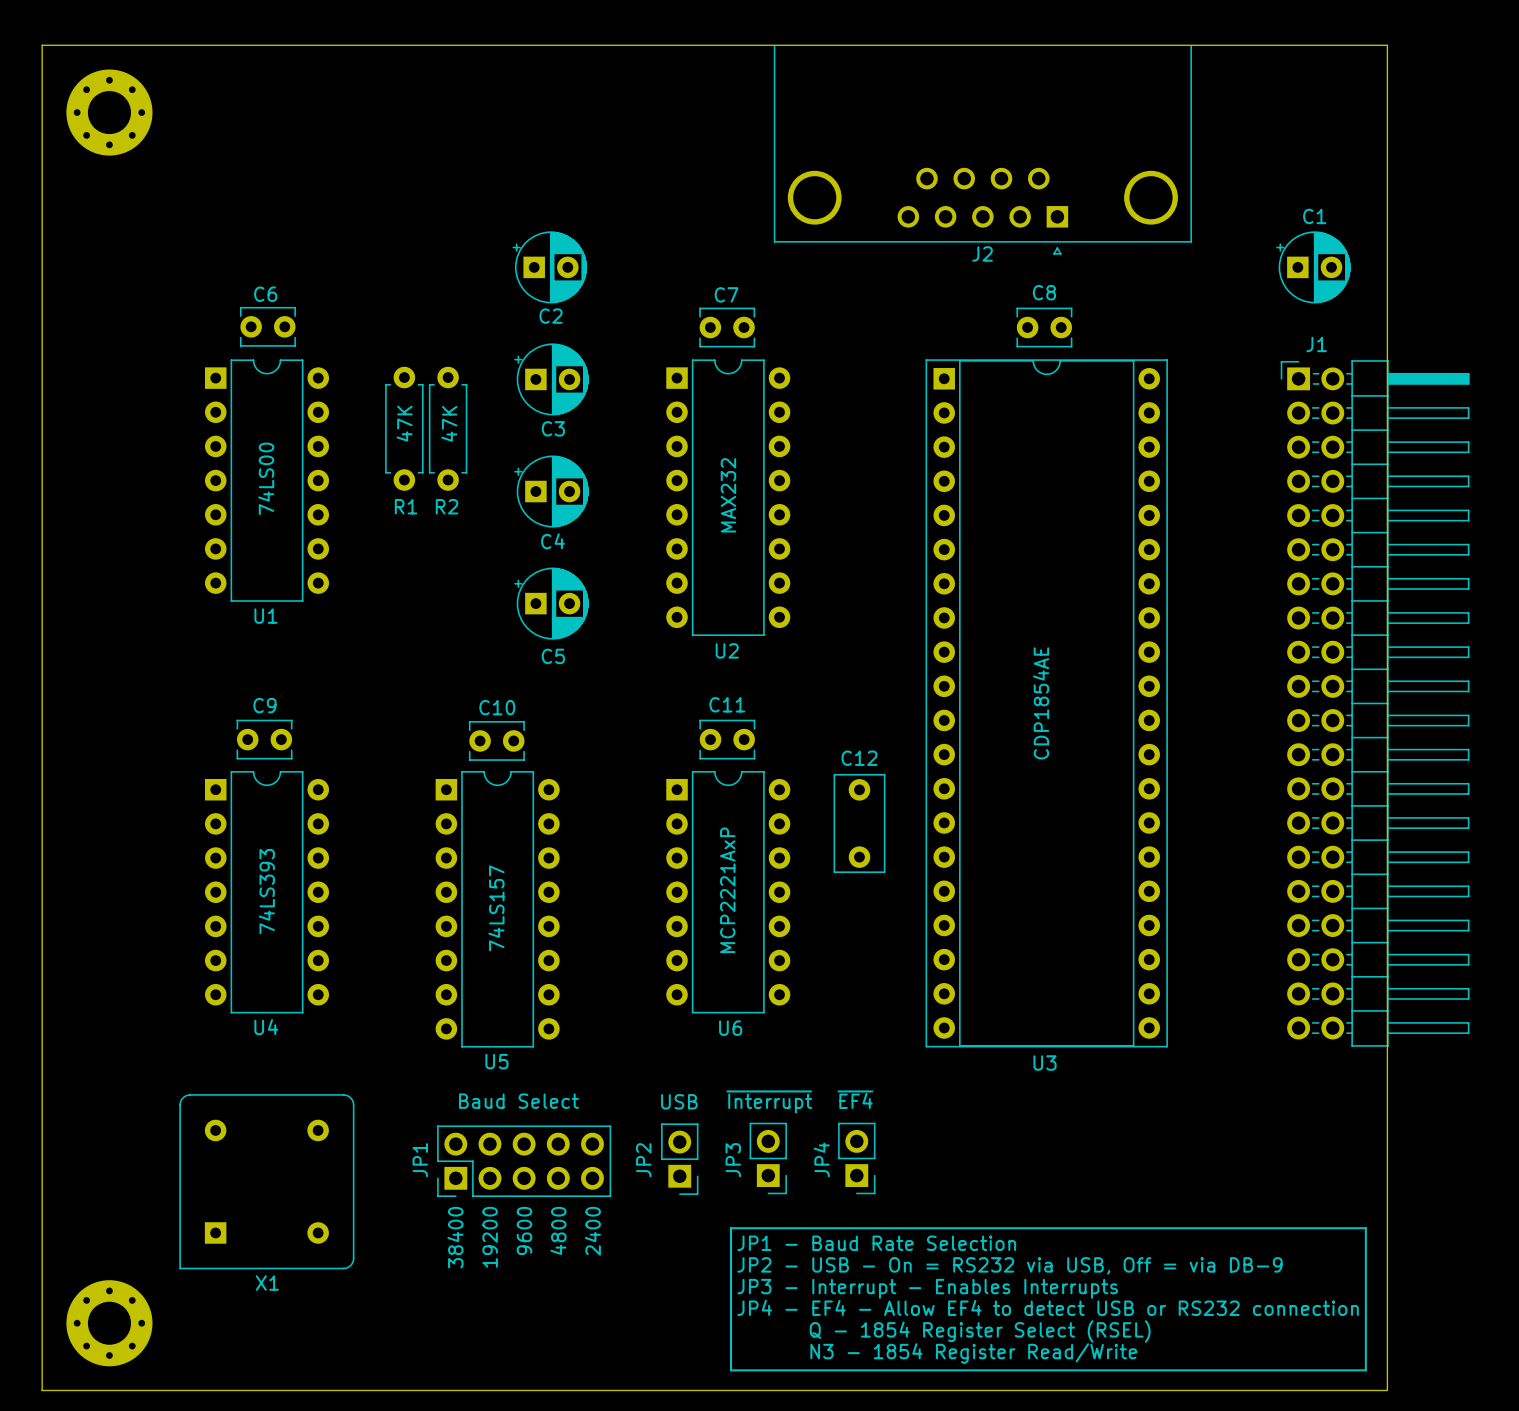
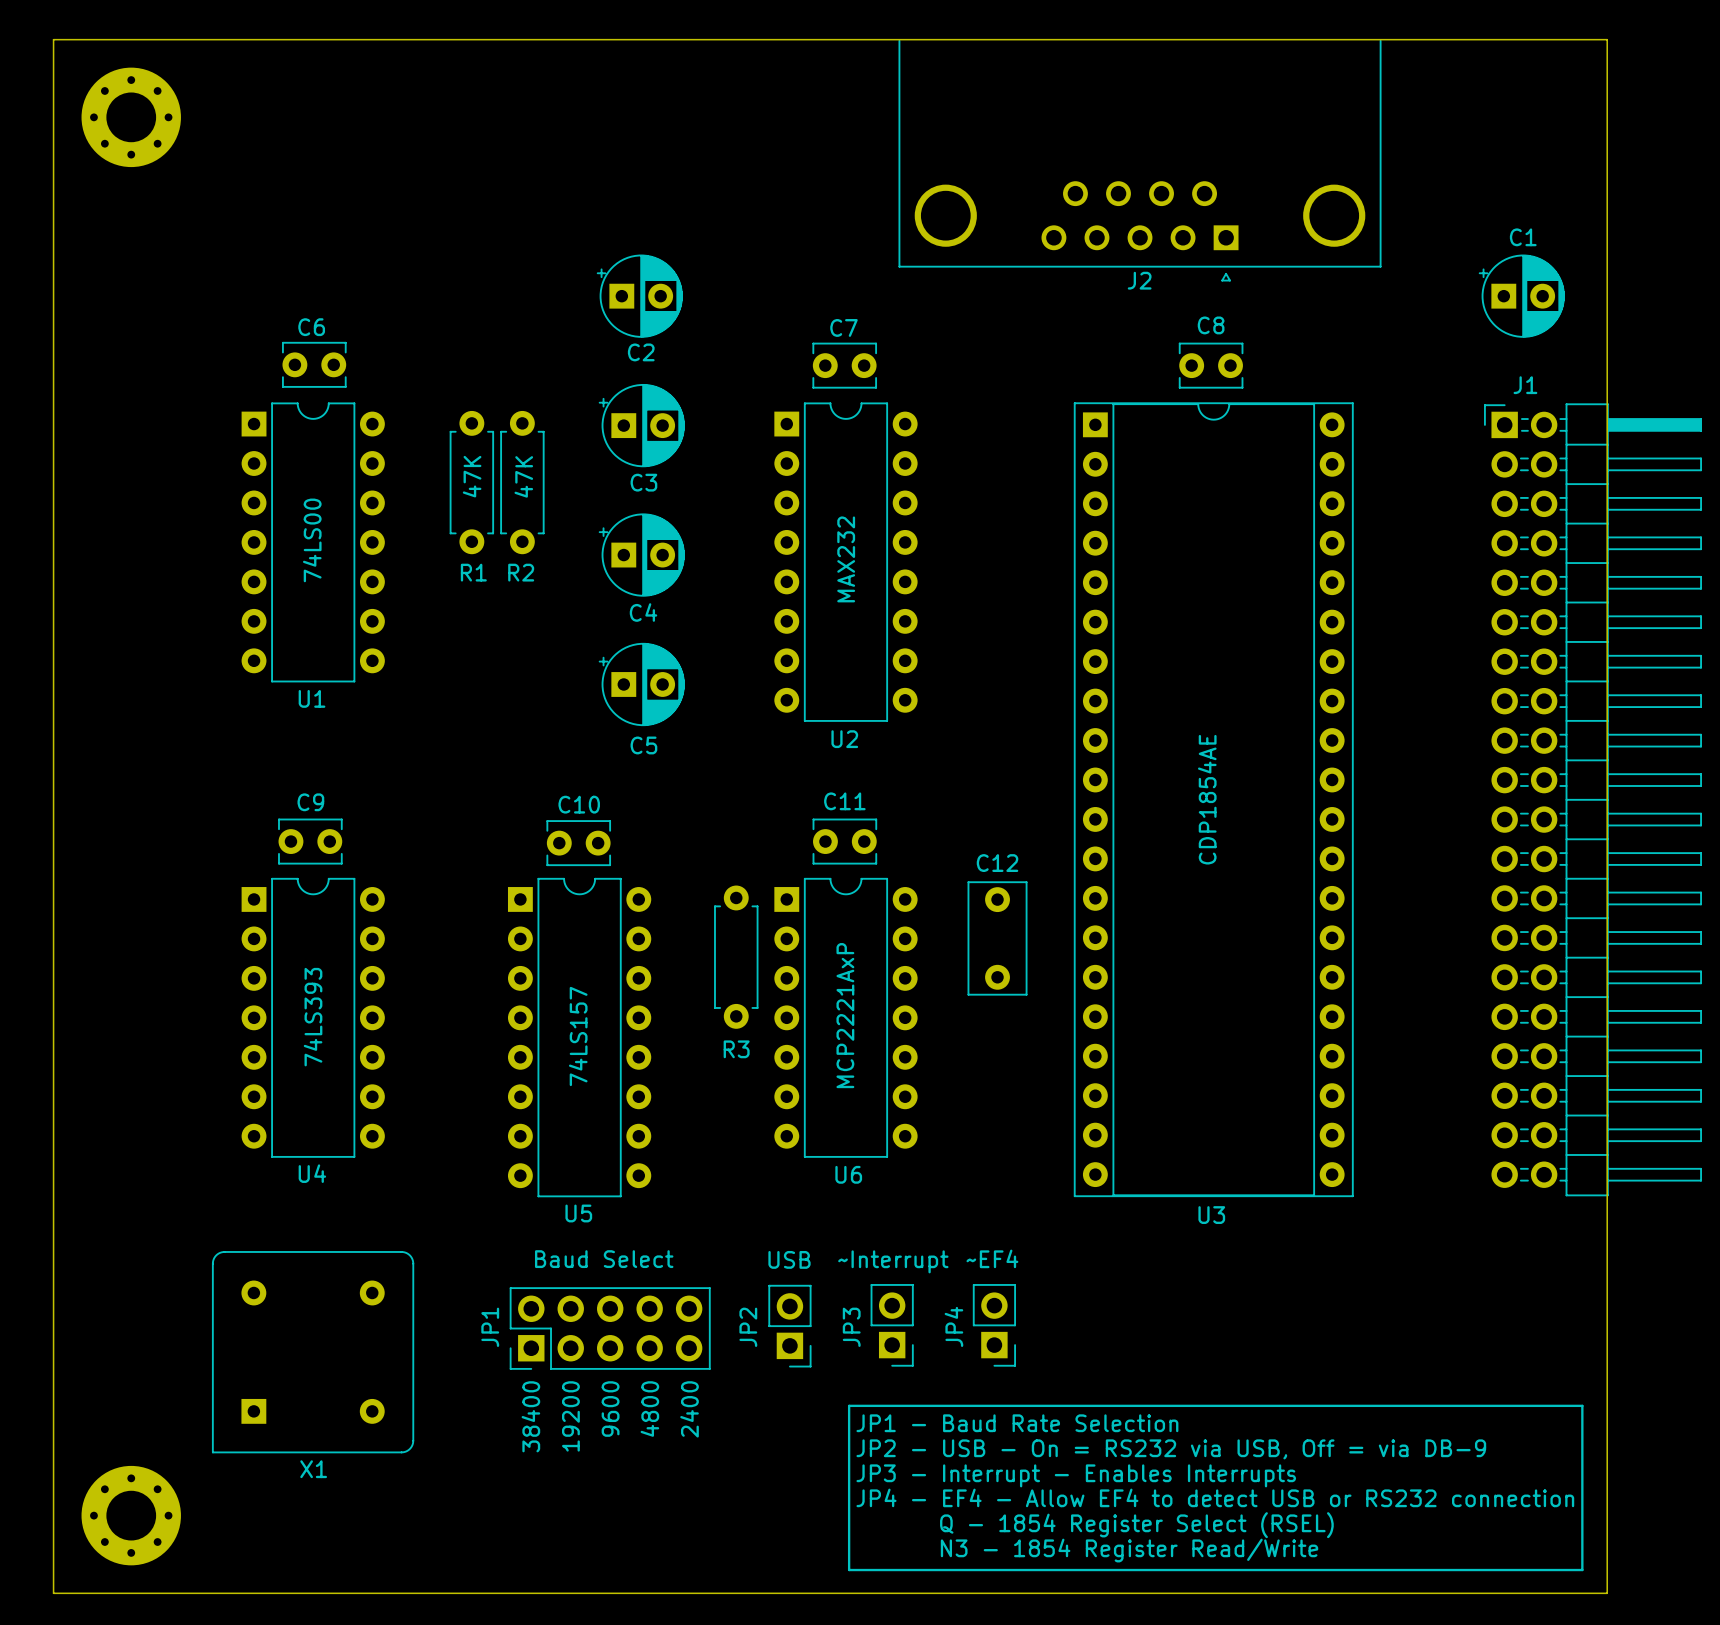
R3: none -> (736, 957)
JP4 value: ~{EF4} (855, 1099) -> ~EF4 (992, 1258)
JP3 value: ~{Interrupt} (769, 1101) -> ~Interrupt (893, 1261)

